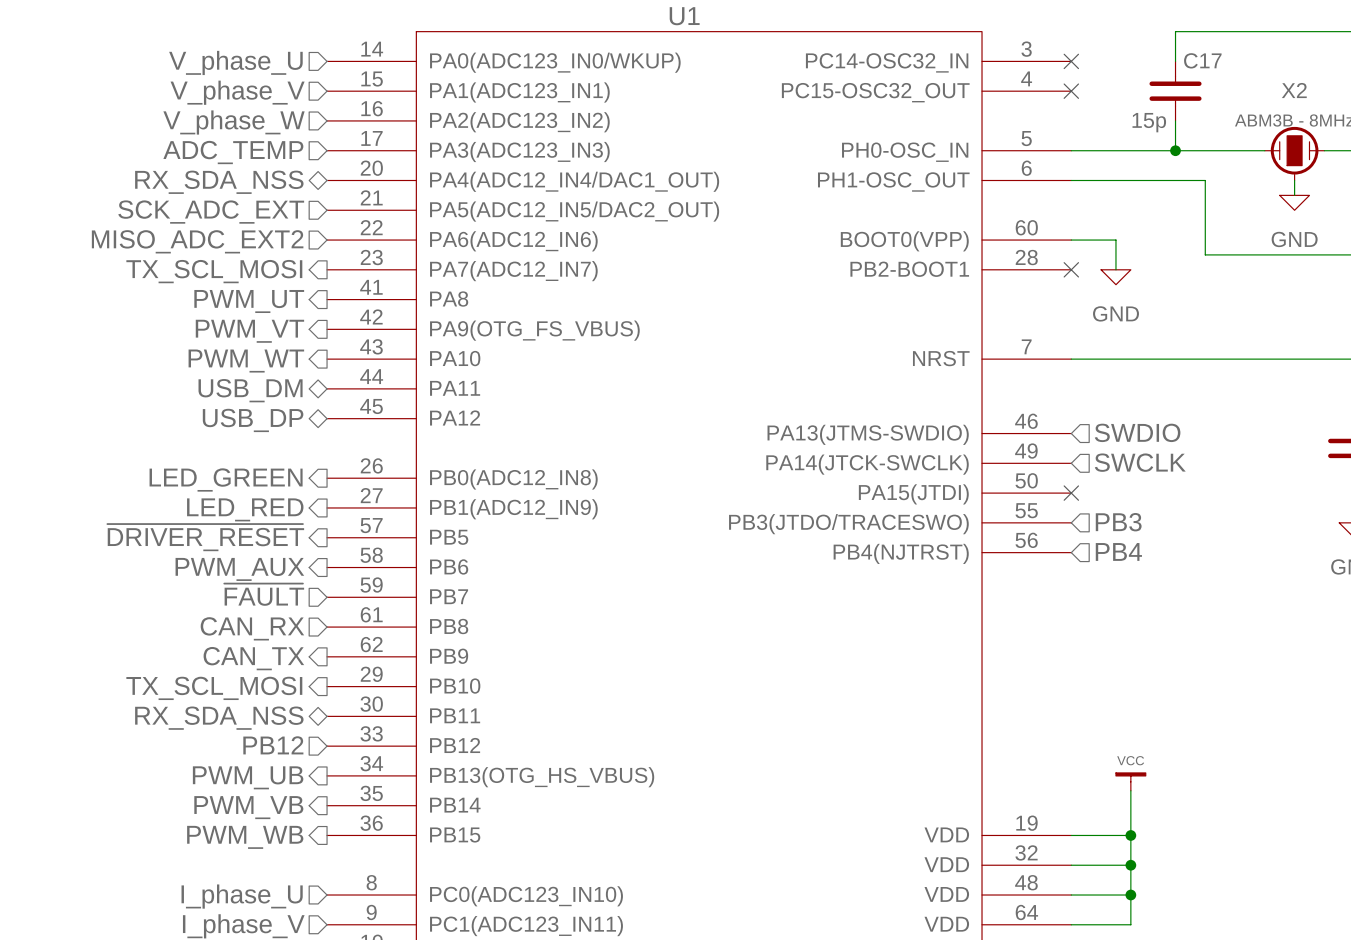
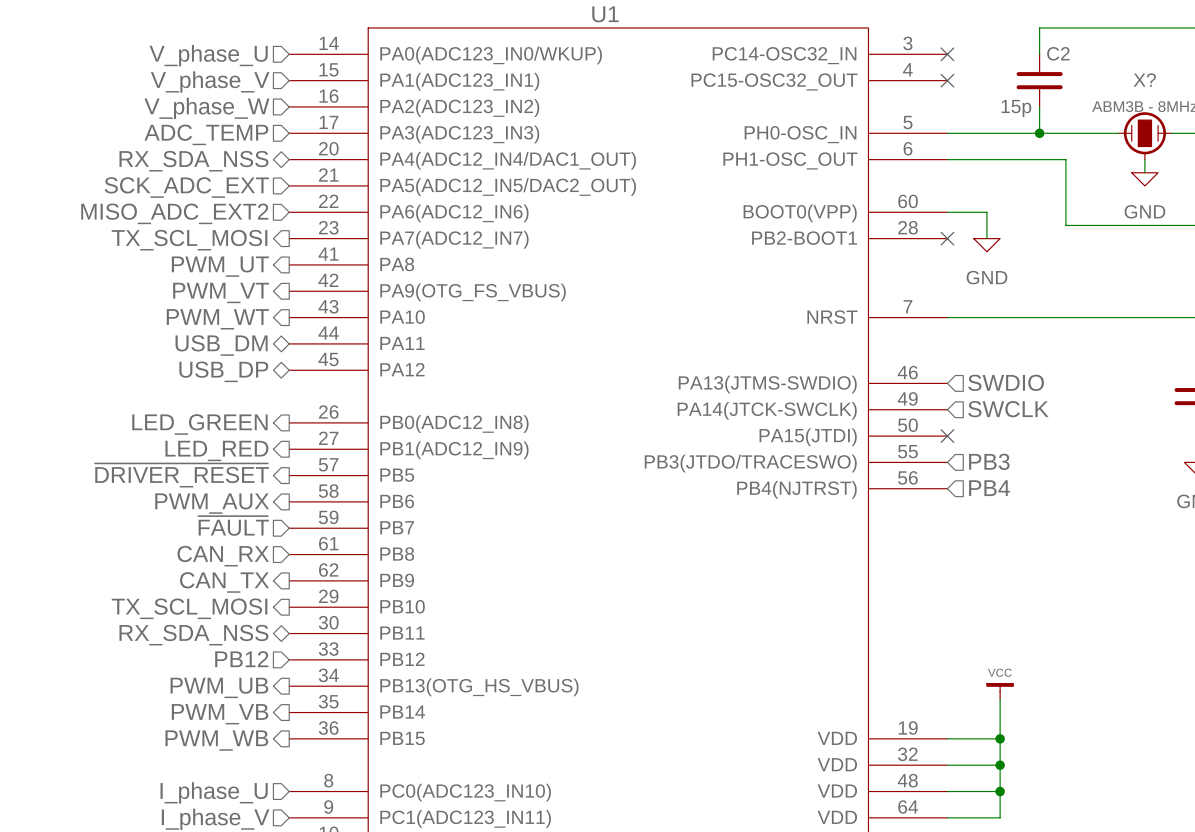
C17 name: C17 (1202, 60) -> C2 (1058, 53)
X2 name: X2 (1294, 90) -> X? (1144, 80)

